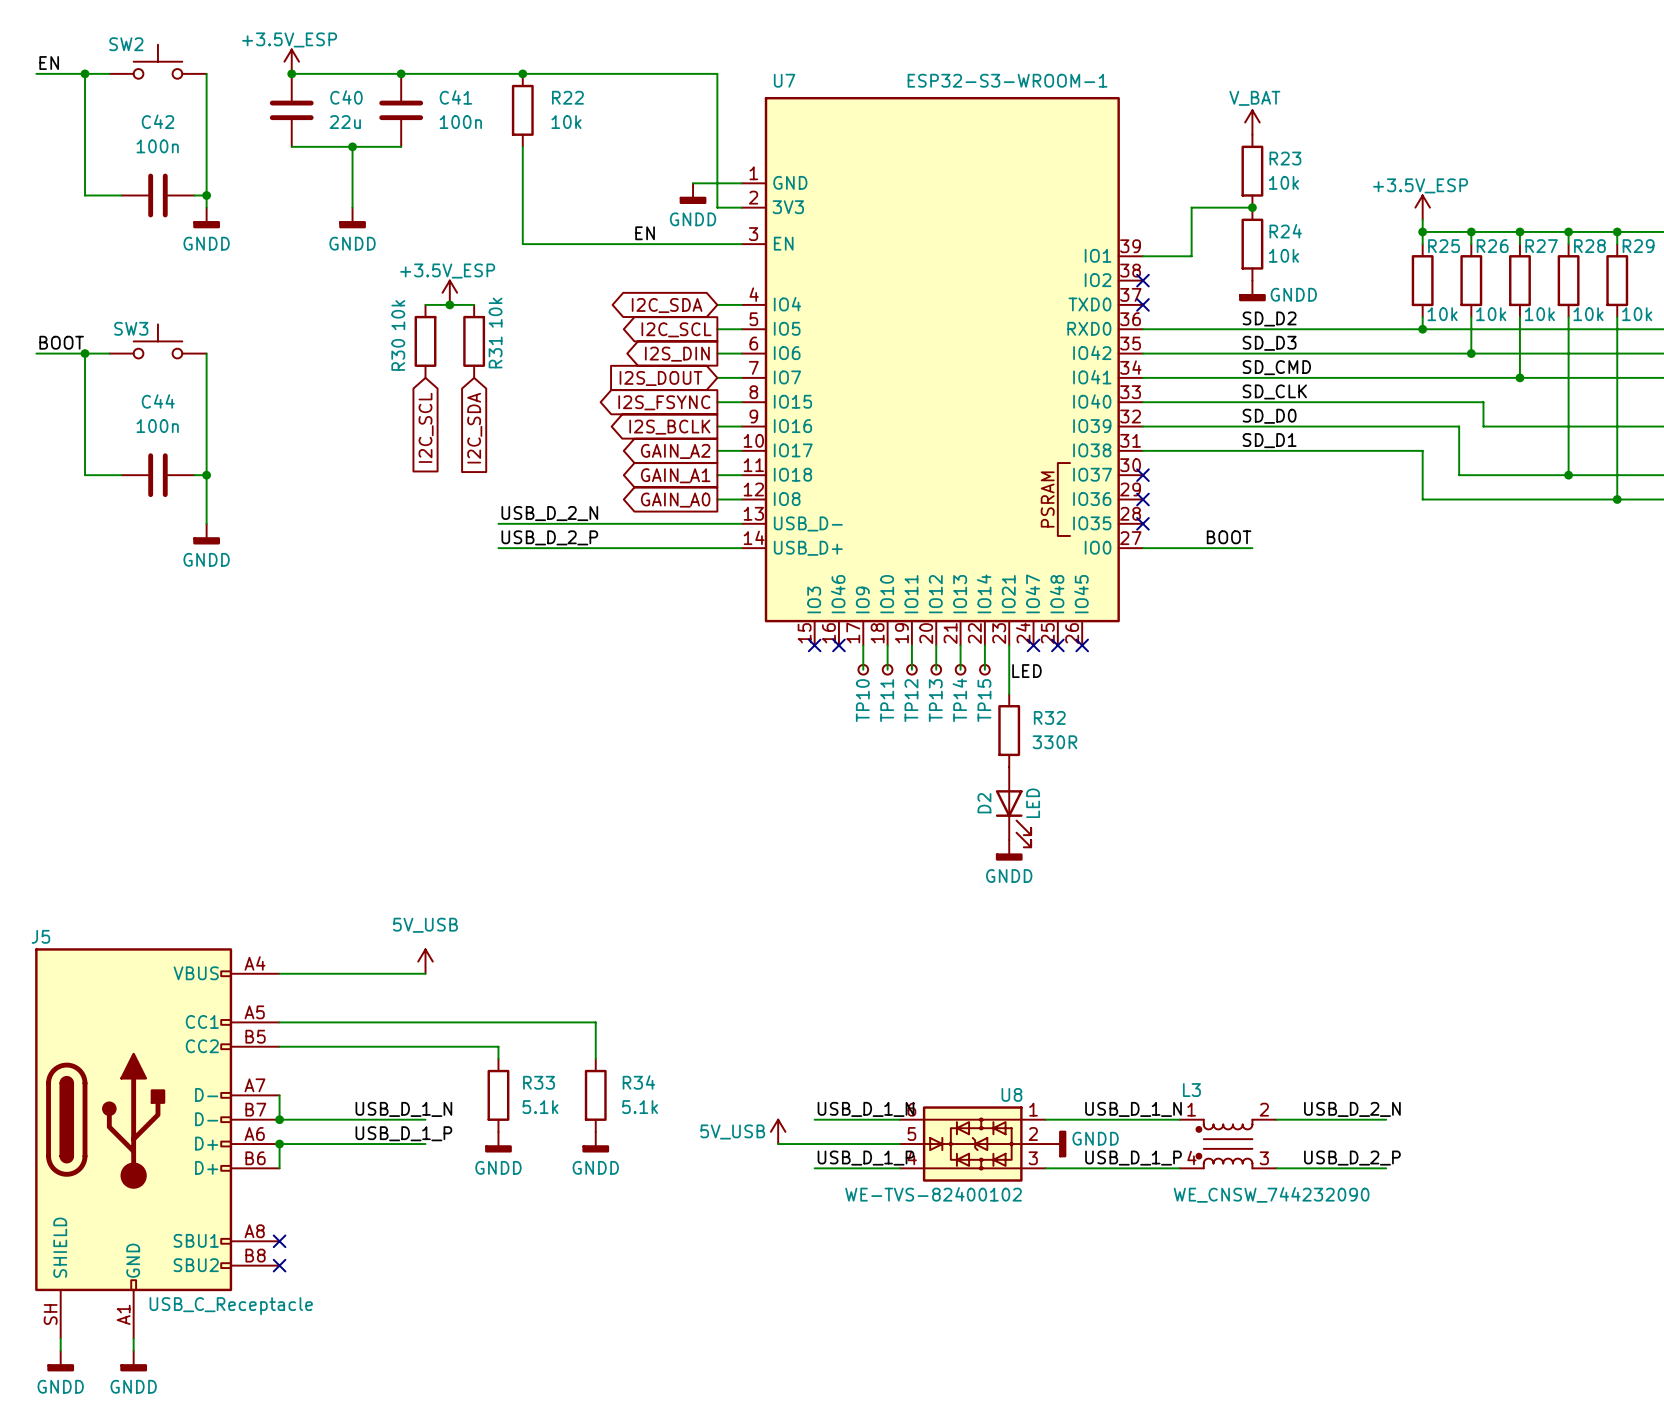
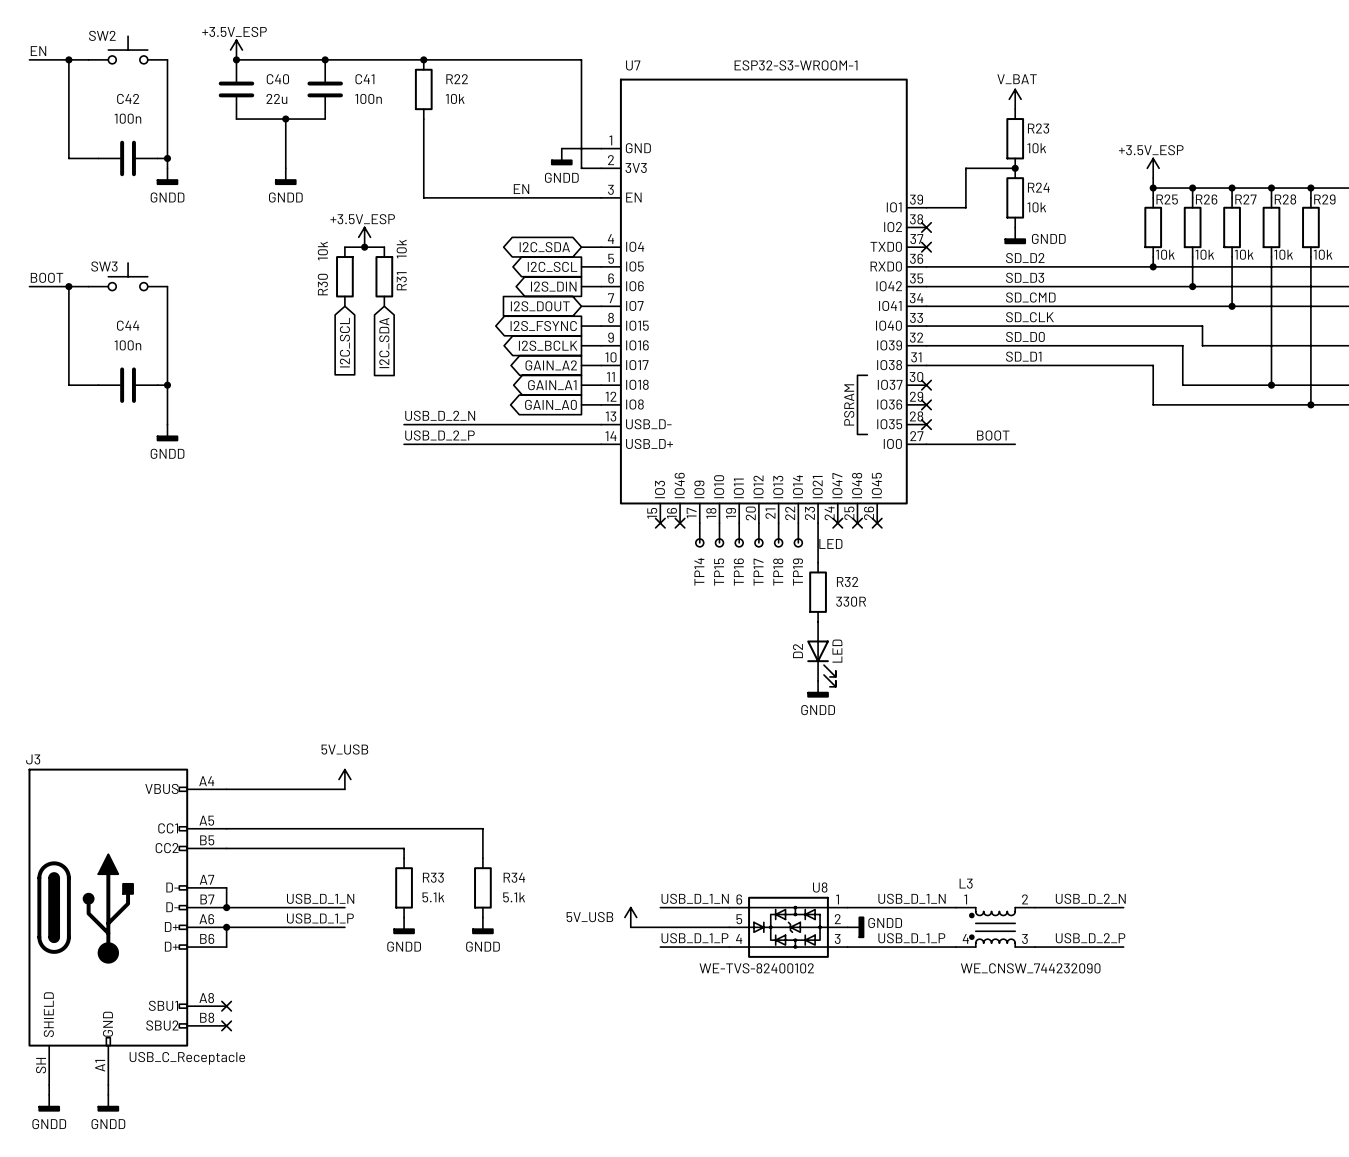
TP10 name: TP10 (862, 700) -> TP14 (699, 571)
TP11 name: TP11 (887, 700) -> TP15 (719, 572)
TP12 name: TP12 (911, 700) -> TP16 (738, 572)
TP13 name: TP13 (935, 700) -> TP17 (758, 572)
TP14 name: TP14 (959, 700) -> TP18 (778, 572)
TP15 name: TP15 (984, 700) -> TP19 (797, 572)
J5 name: J5 (40, 936) -> J3 (33, 759)

